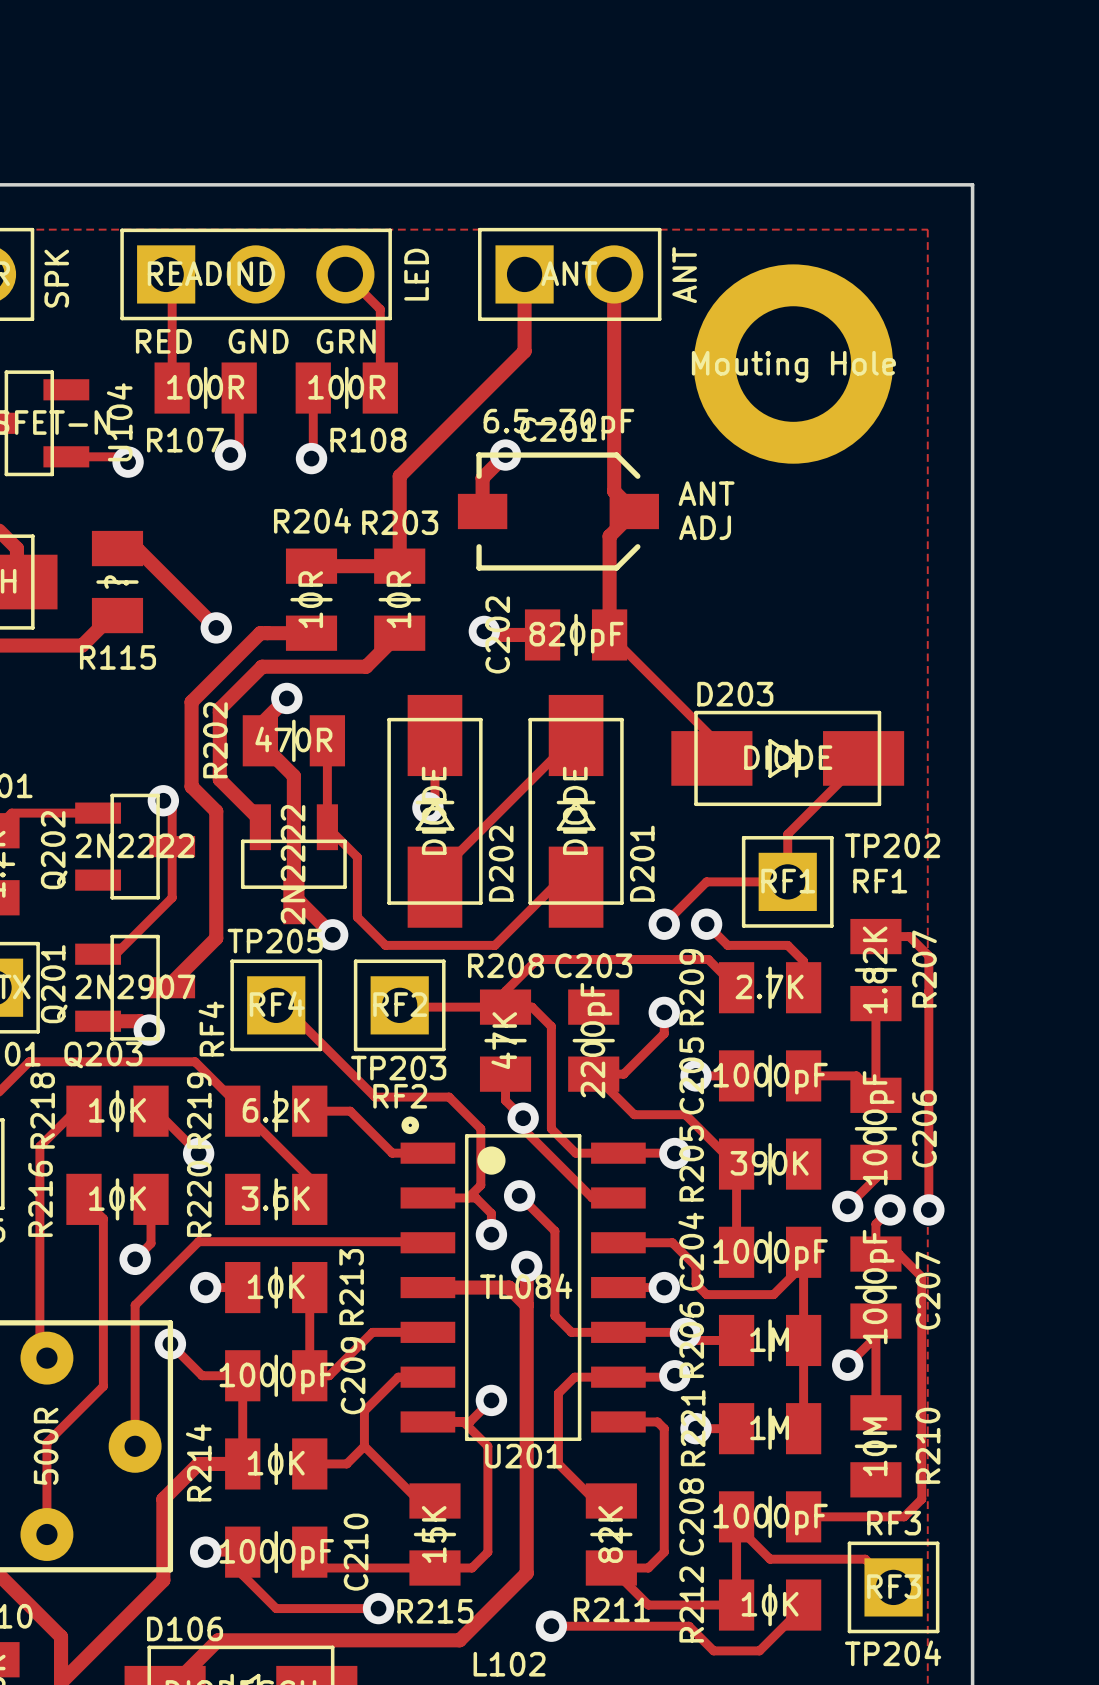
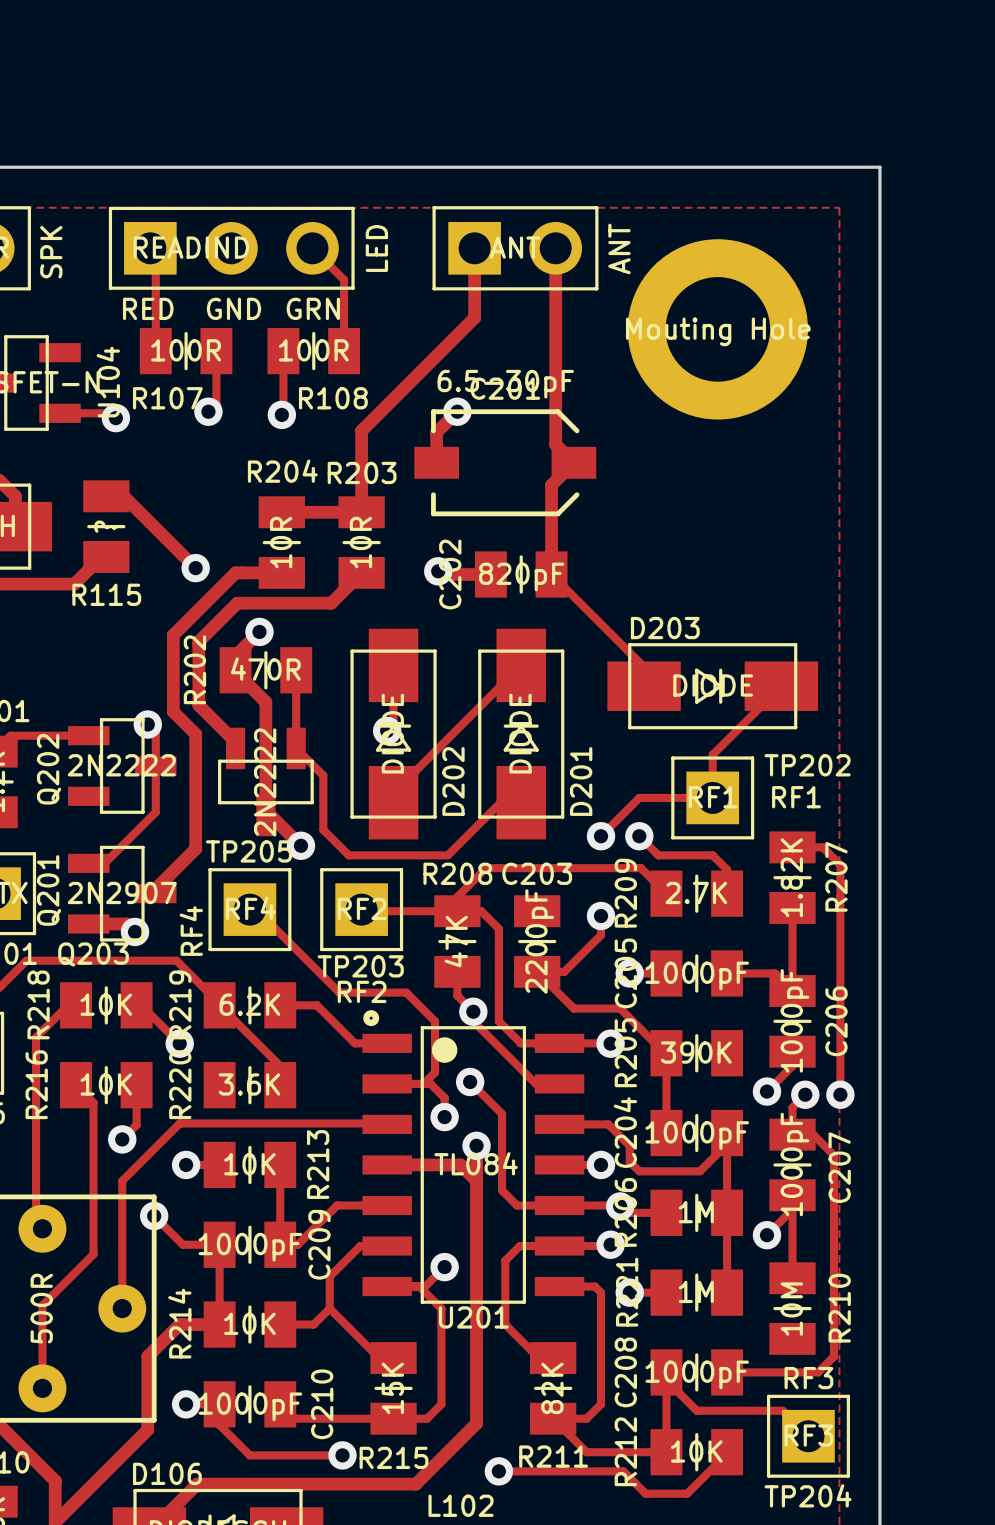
text: ANT (706, 493) -> none
text: ADJ (705, 527) -> none

